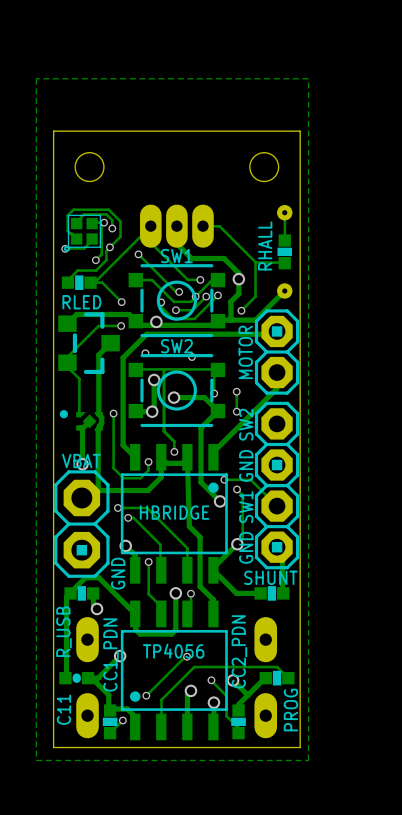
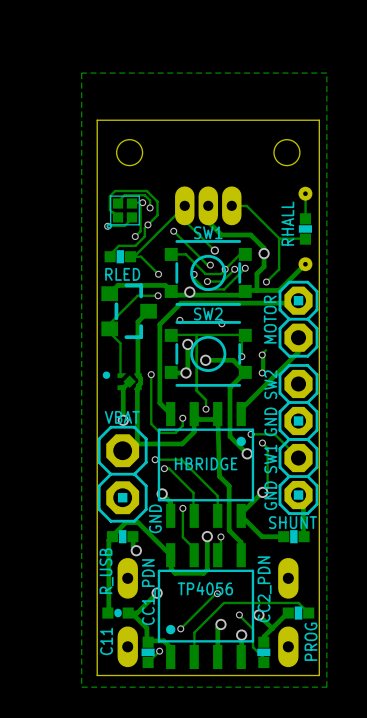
track: (183, 275) (187, 279) (200, 279) -> none
via: none -> (214, 250)
via: (200, 279) -> none
track: none -> (265, 350) (264, 352) (264, 371)

